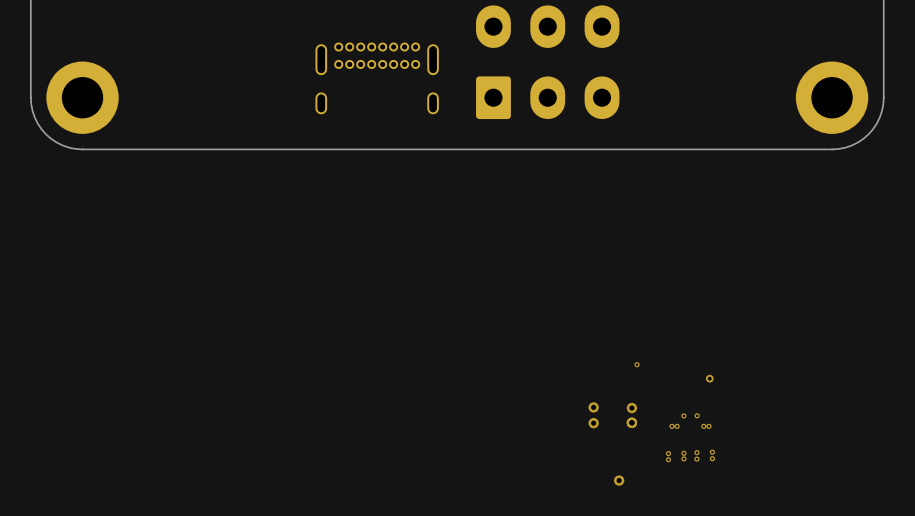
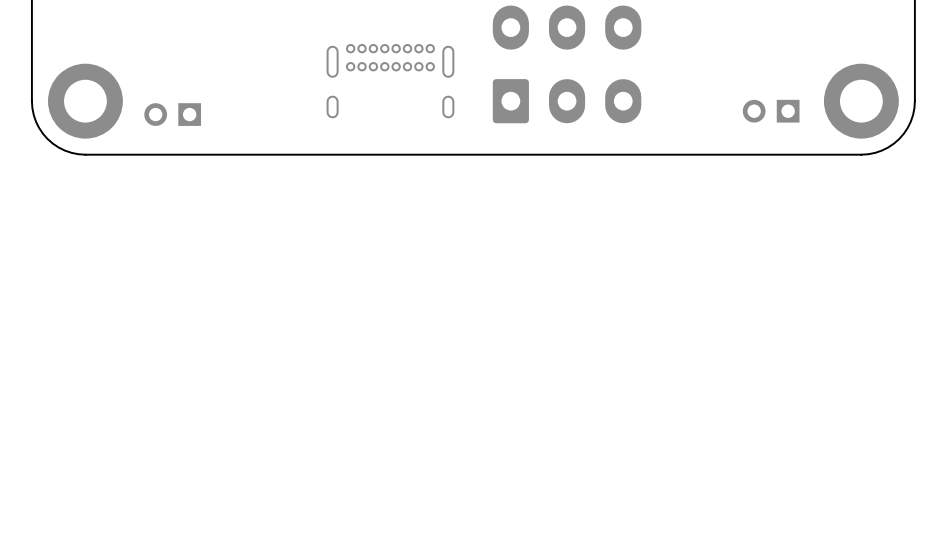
part: none -> (771, 111)
part: none -> (172, 114)
via: (637, 364) -> none
via: (709, 378) -> none
via: (593, 407) -> none
via: (631, 408) -> none
via: (683, 415) -> none
via: (697, 415) -> none
via: (631, 422) -> none
via: (593, 423) -> none
via: (671, 426) -> none
via: (677, 426) -> none
via: (703, 426) -> none
via: (708, 426) -> none
via: (696, 452) -> none
via: (712, 452) -> none
via: (668, 453) -> none
via: (683, 453) -> none
via: (683, 458) -> none
via: (712, 458) -> none
via: (668, 459) -> none
via: (696, 459) -> none
via: (619, 480) -> none

